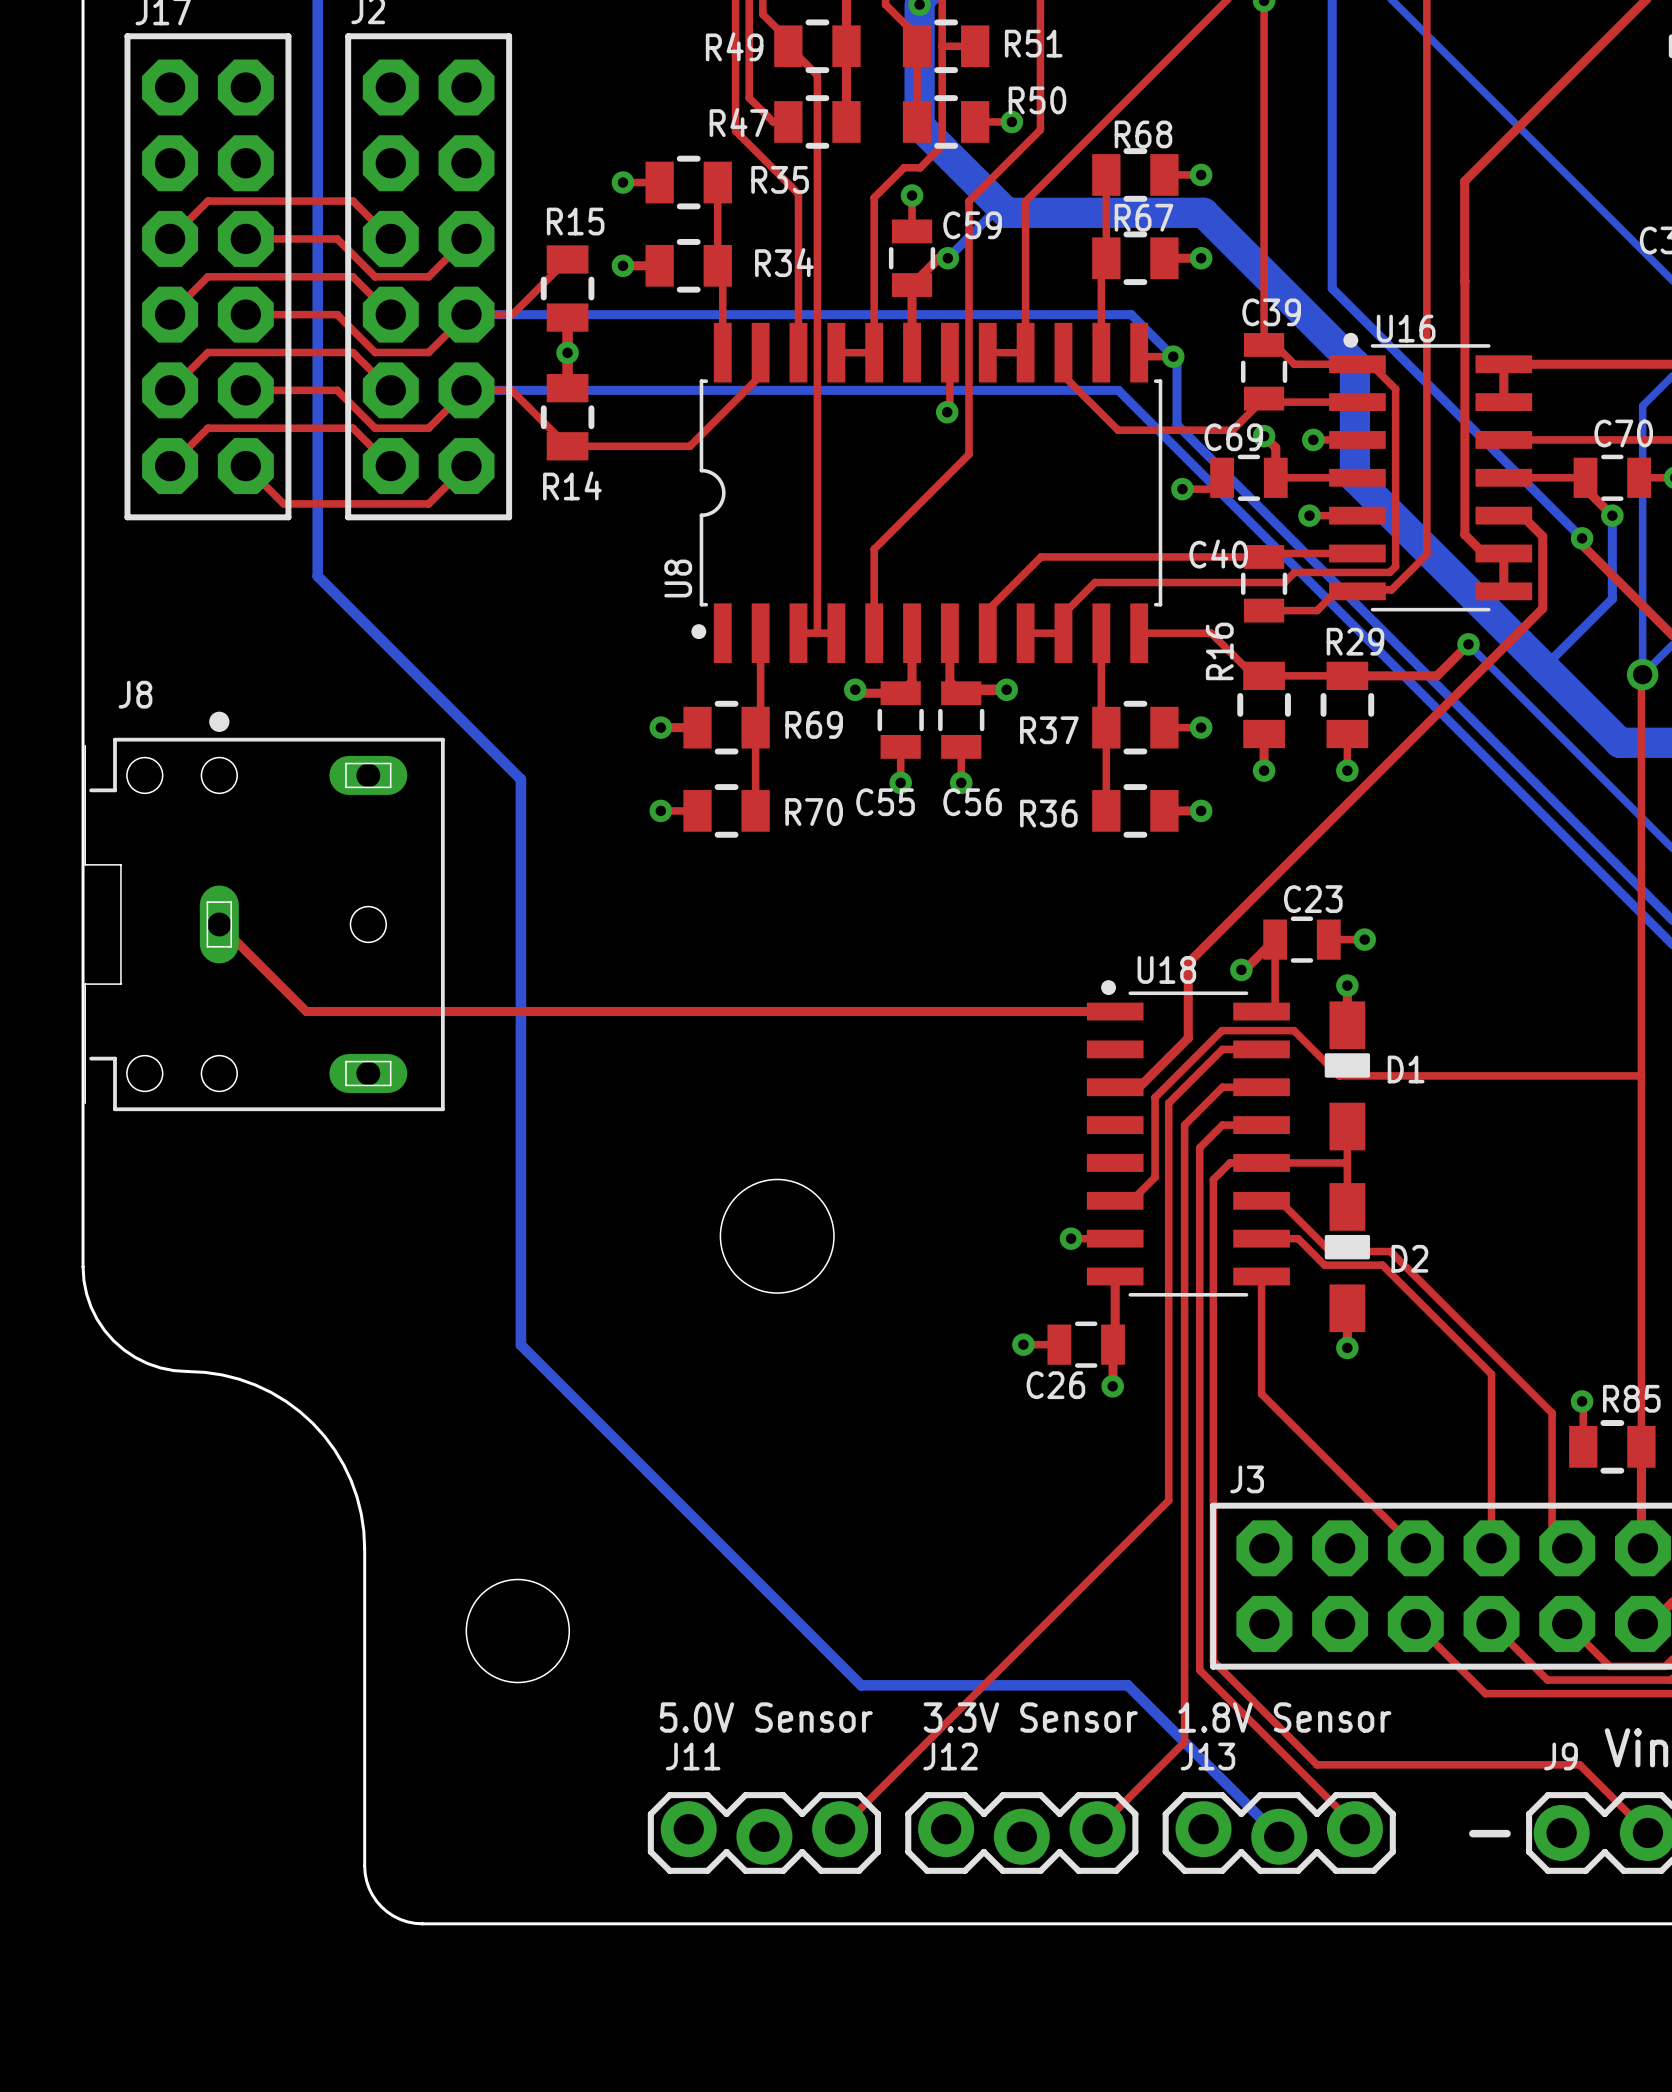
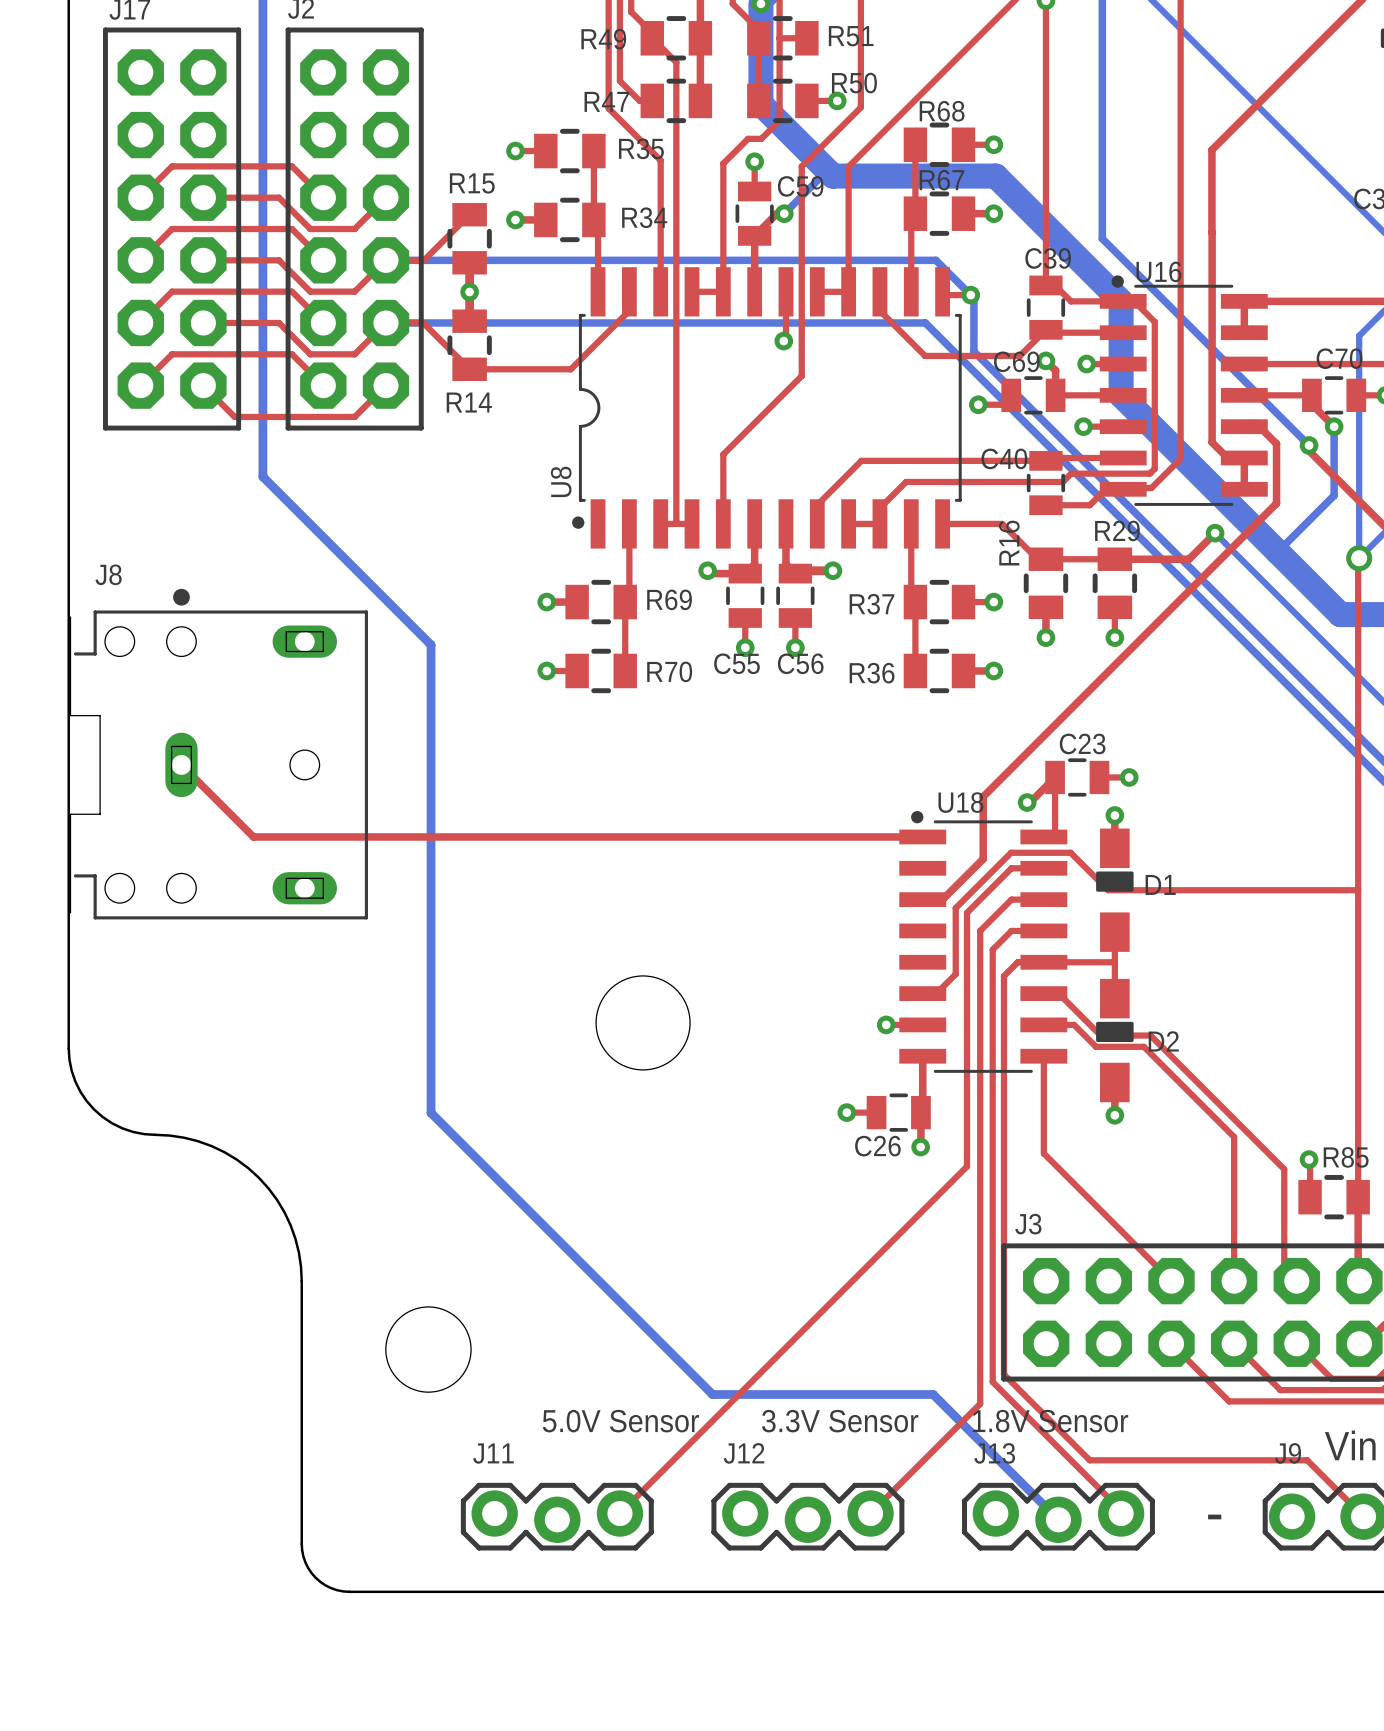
top track: (1168, 1409) (1168, 1500) (840, 1829) -> (967, 1166) (619, 1513)
top track: (1184, 1696) (1184, 1742) (1097, 1829) -> (980, 1403) (870, 1513)
J11 position: (764, 1832) -> (557, 1516)
J12 position: (1021, 1832) -> (807, 1516)

